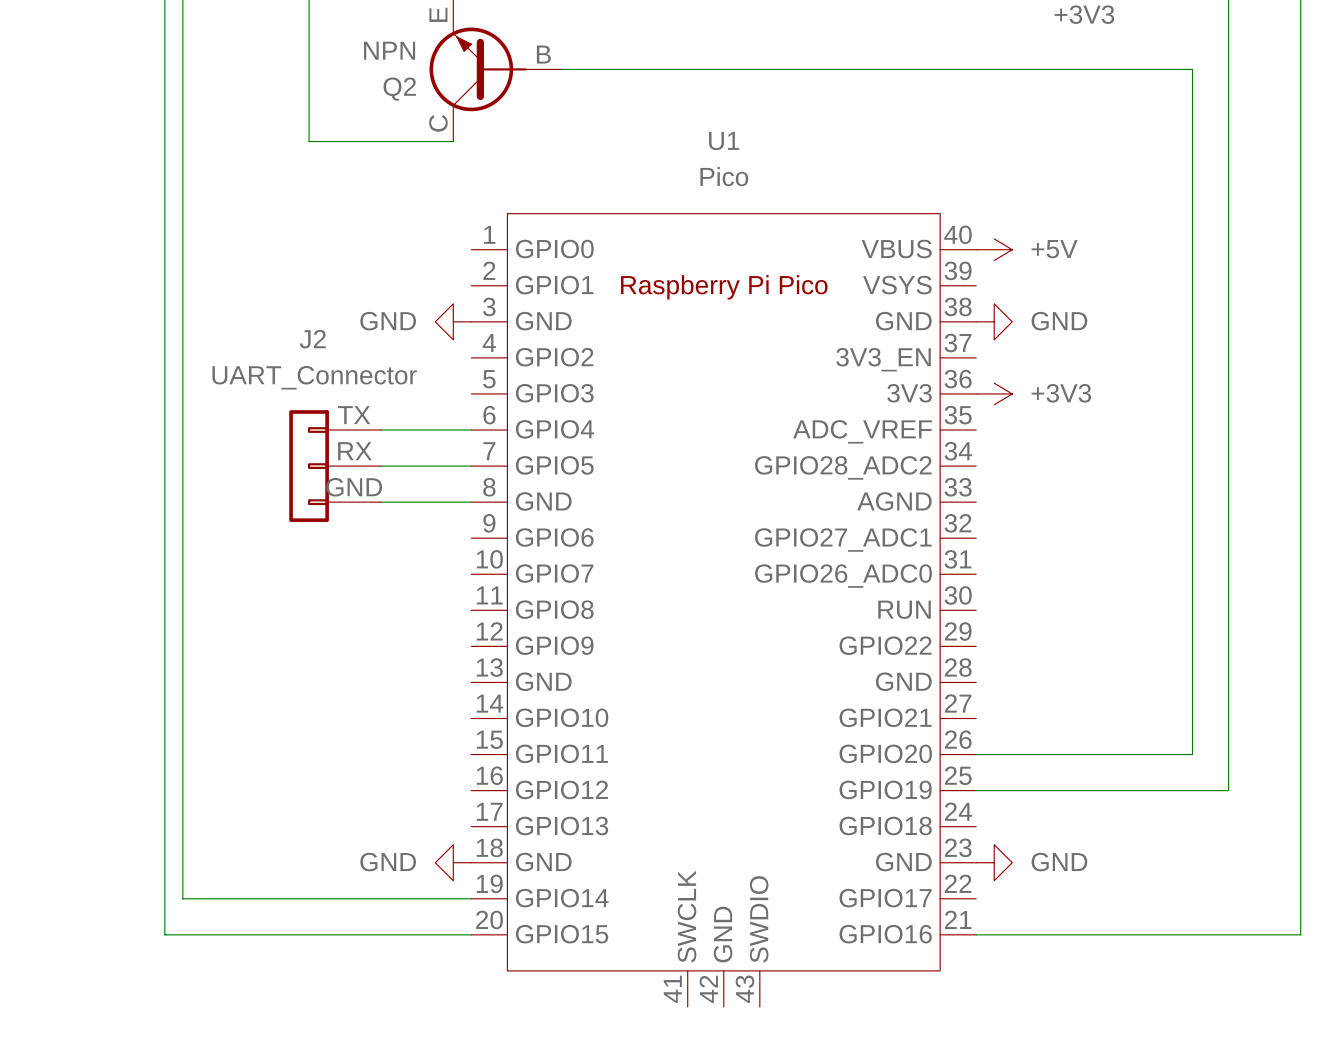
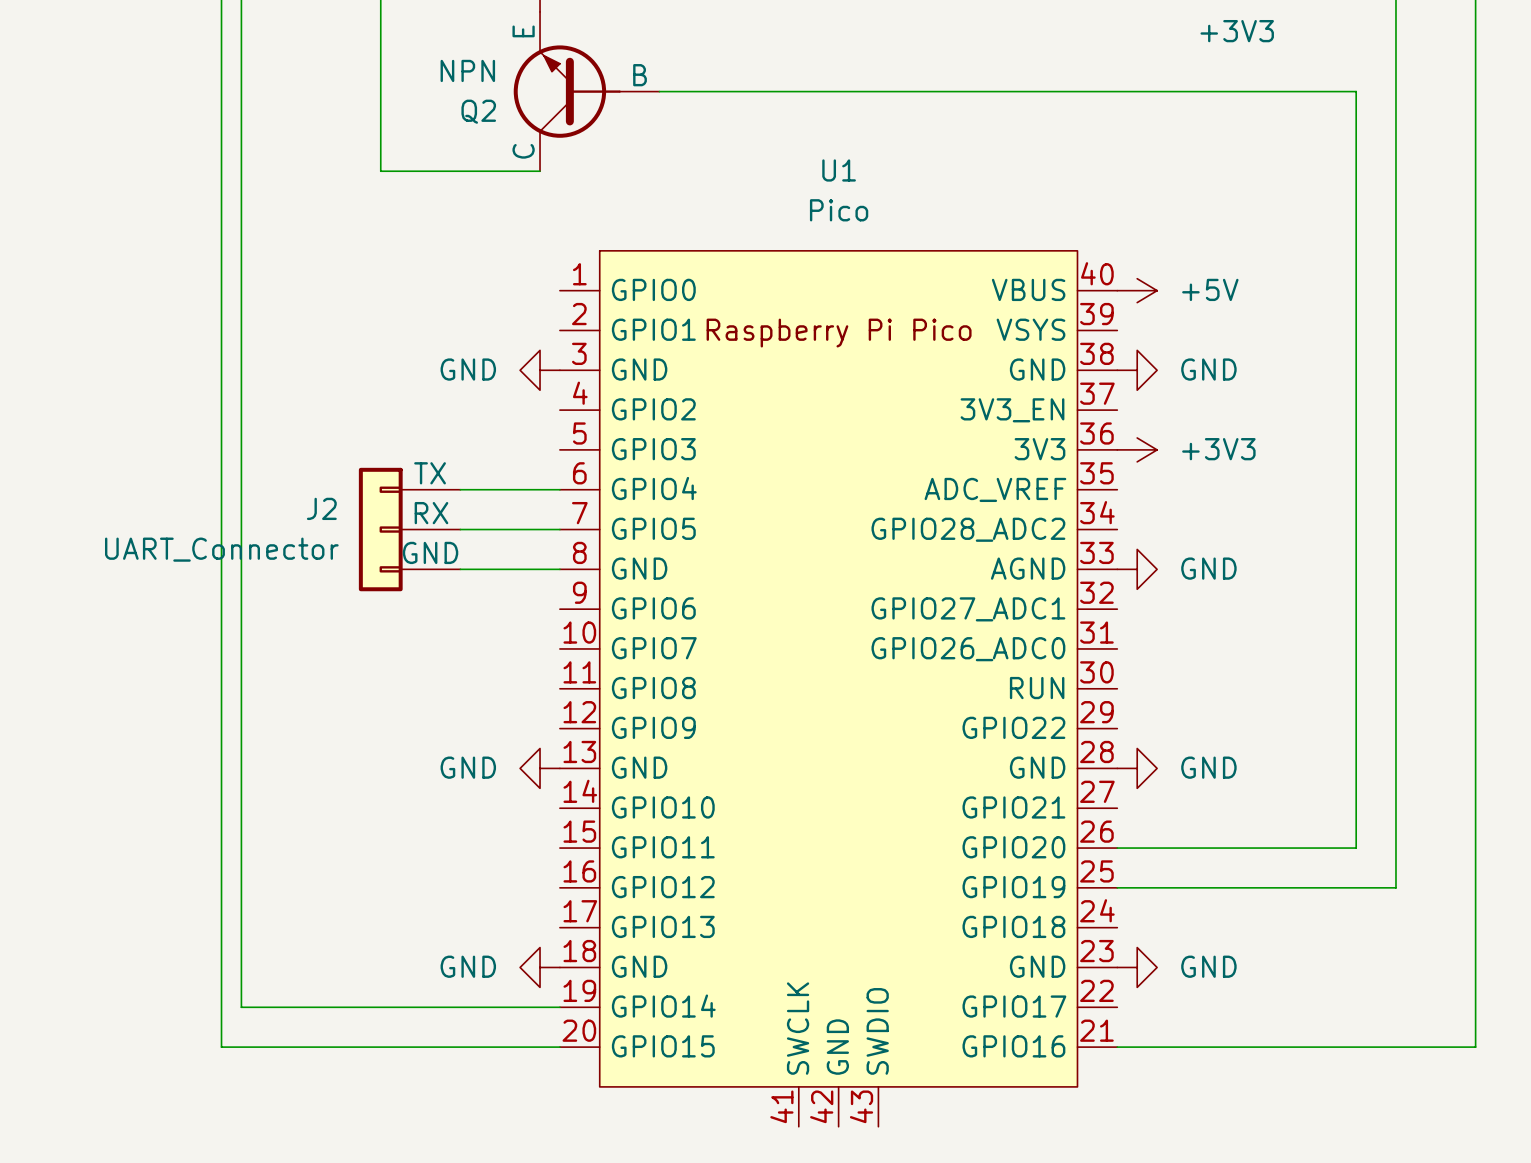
J2 name position: J2 (312, 339) -> J2 (321, 508)
J2 value position: UART_Connector (314, 377) -> UART_Connector (221, 549)
power symbol: none -> GND (1137, 569)
power symbol: none -> GND (540, 768)
power symbol: none -> GND (1137, 768)

